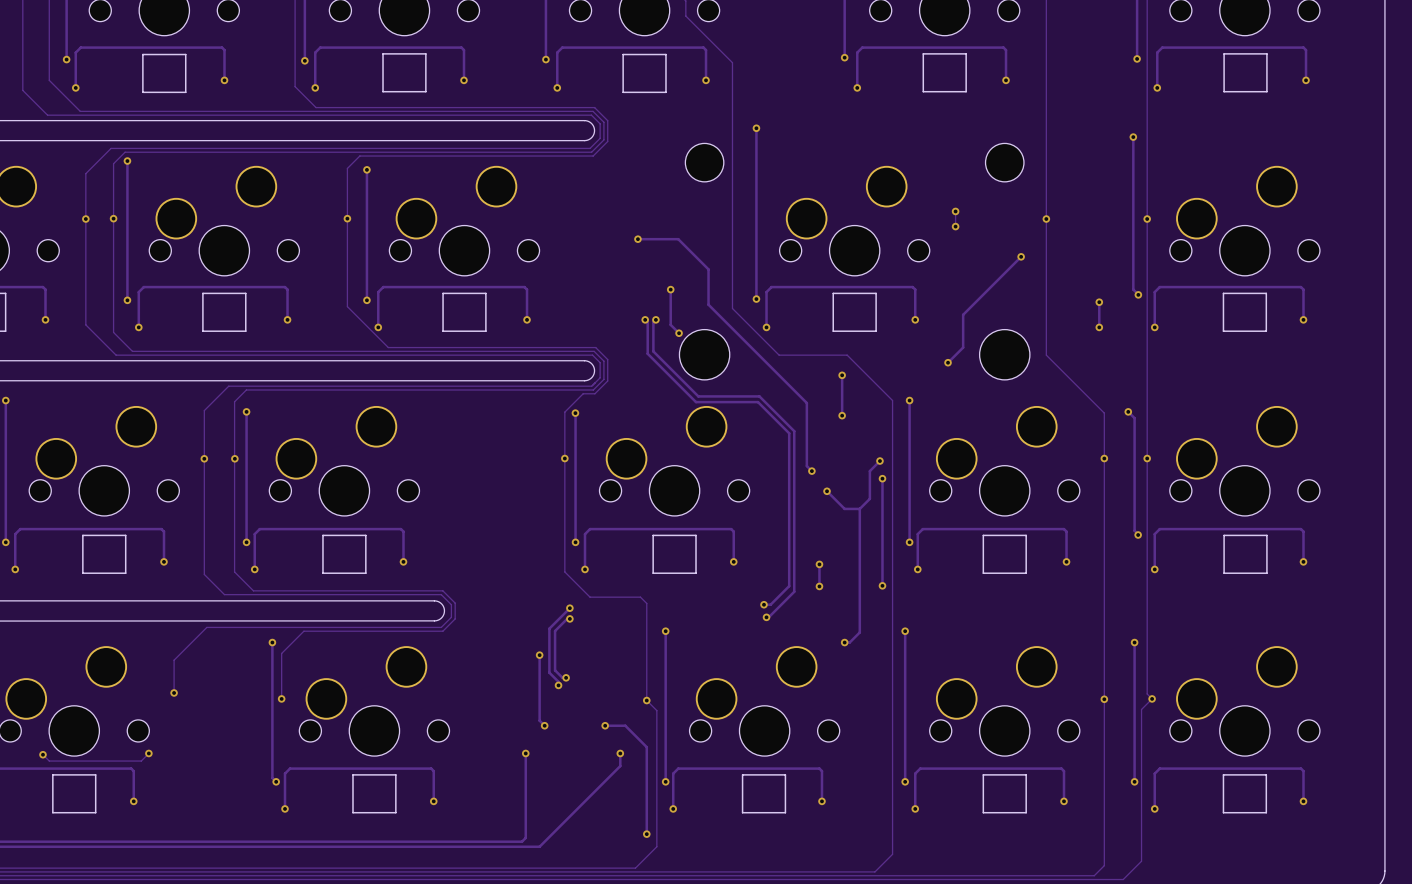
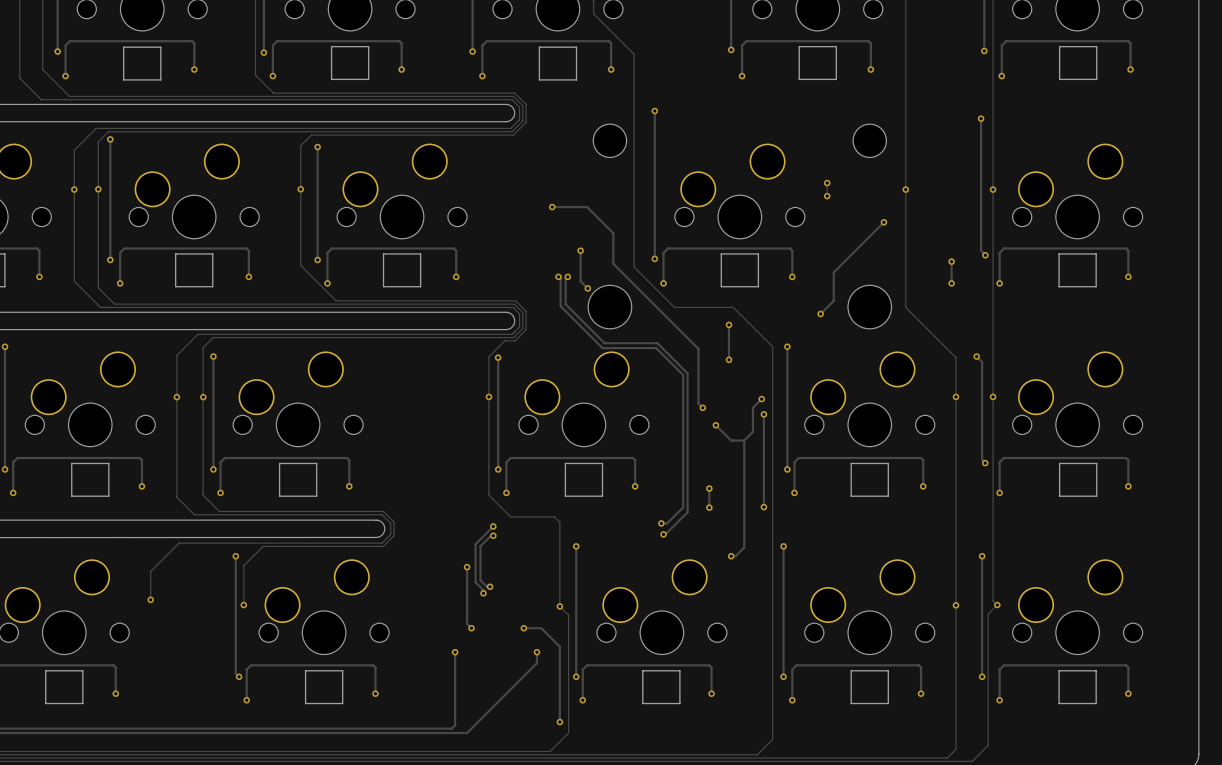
track: (148, 753) (141, 761) (49, 761) (42, 754) -> none
via: (148, 753) -> none
via: (42, 754) -> none

